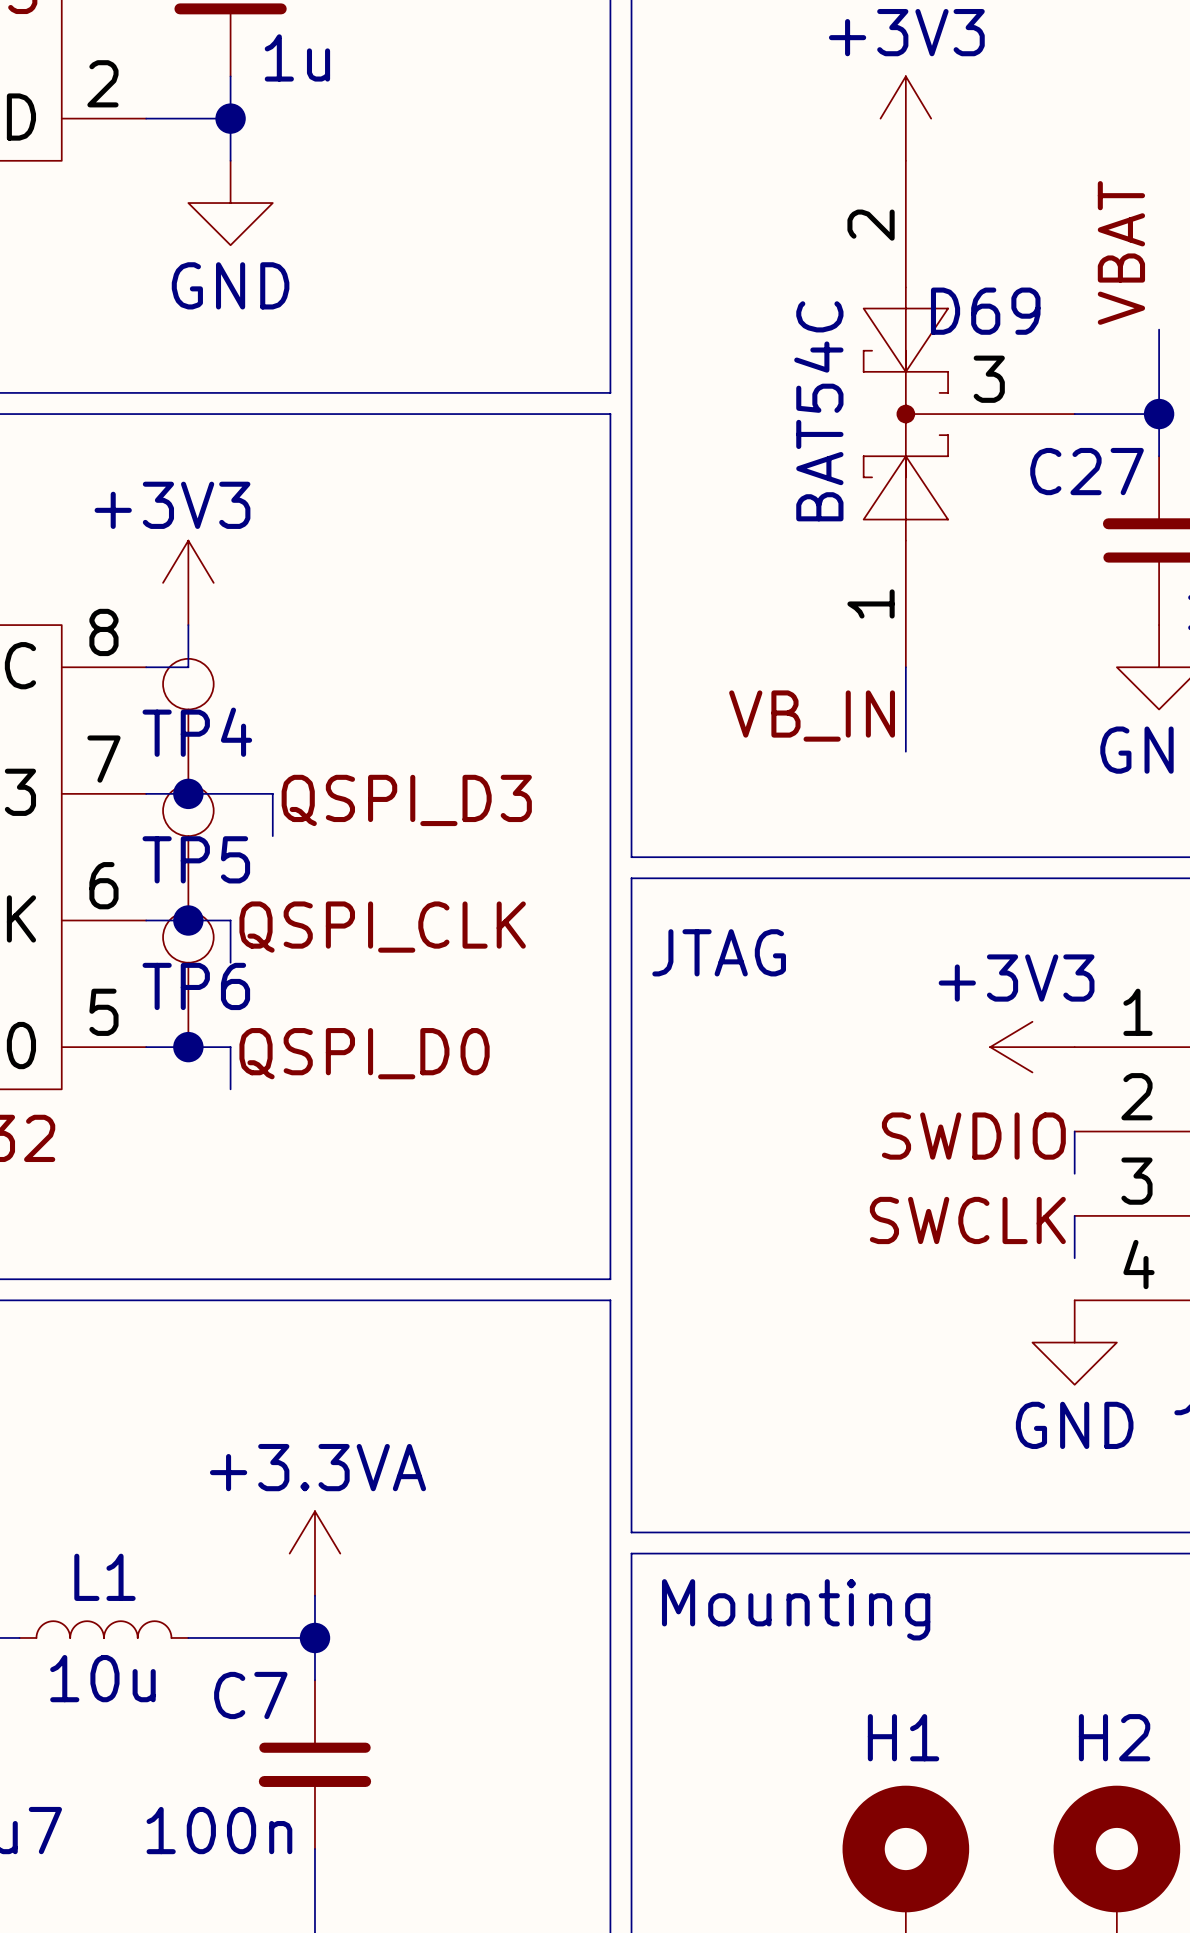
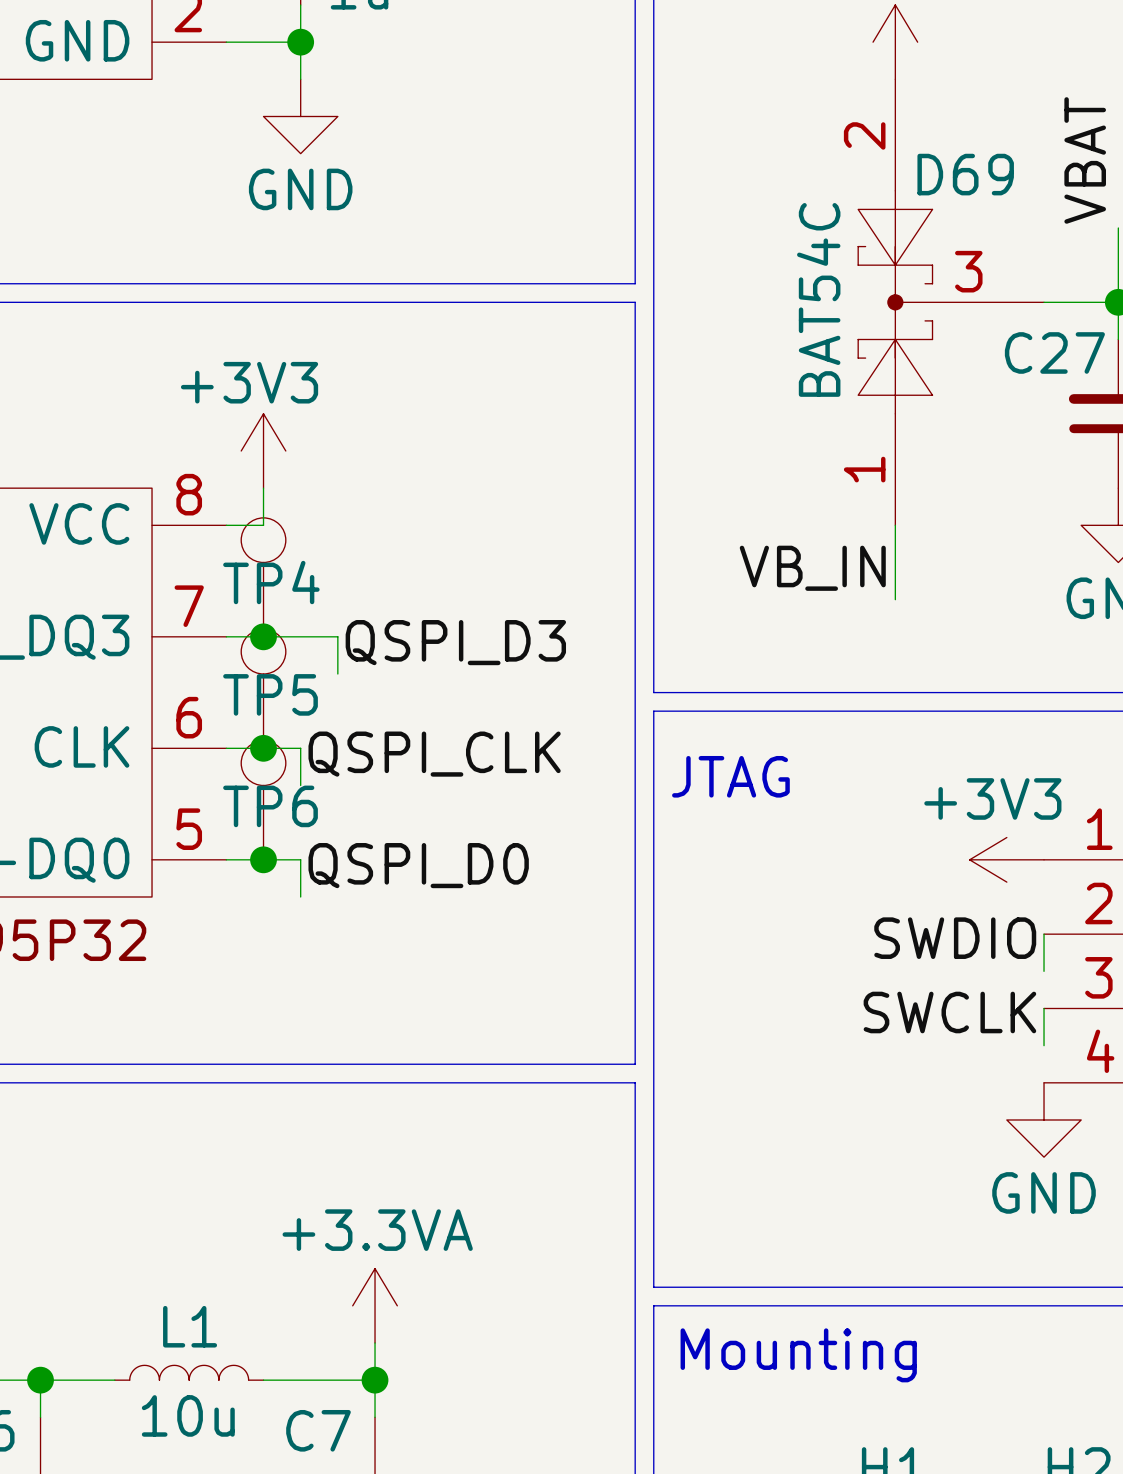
D69 name position: D69 (985, 311) -> D69 (965, 174)

